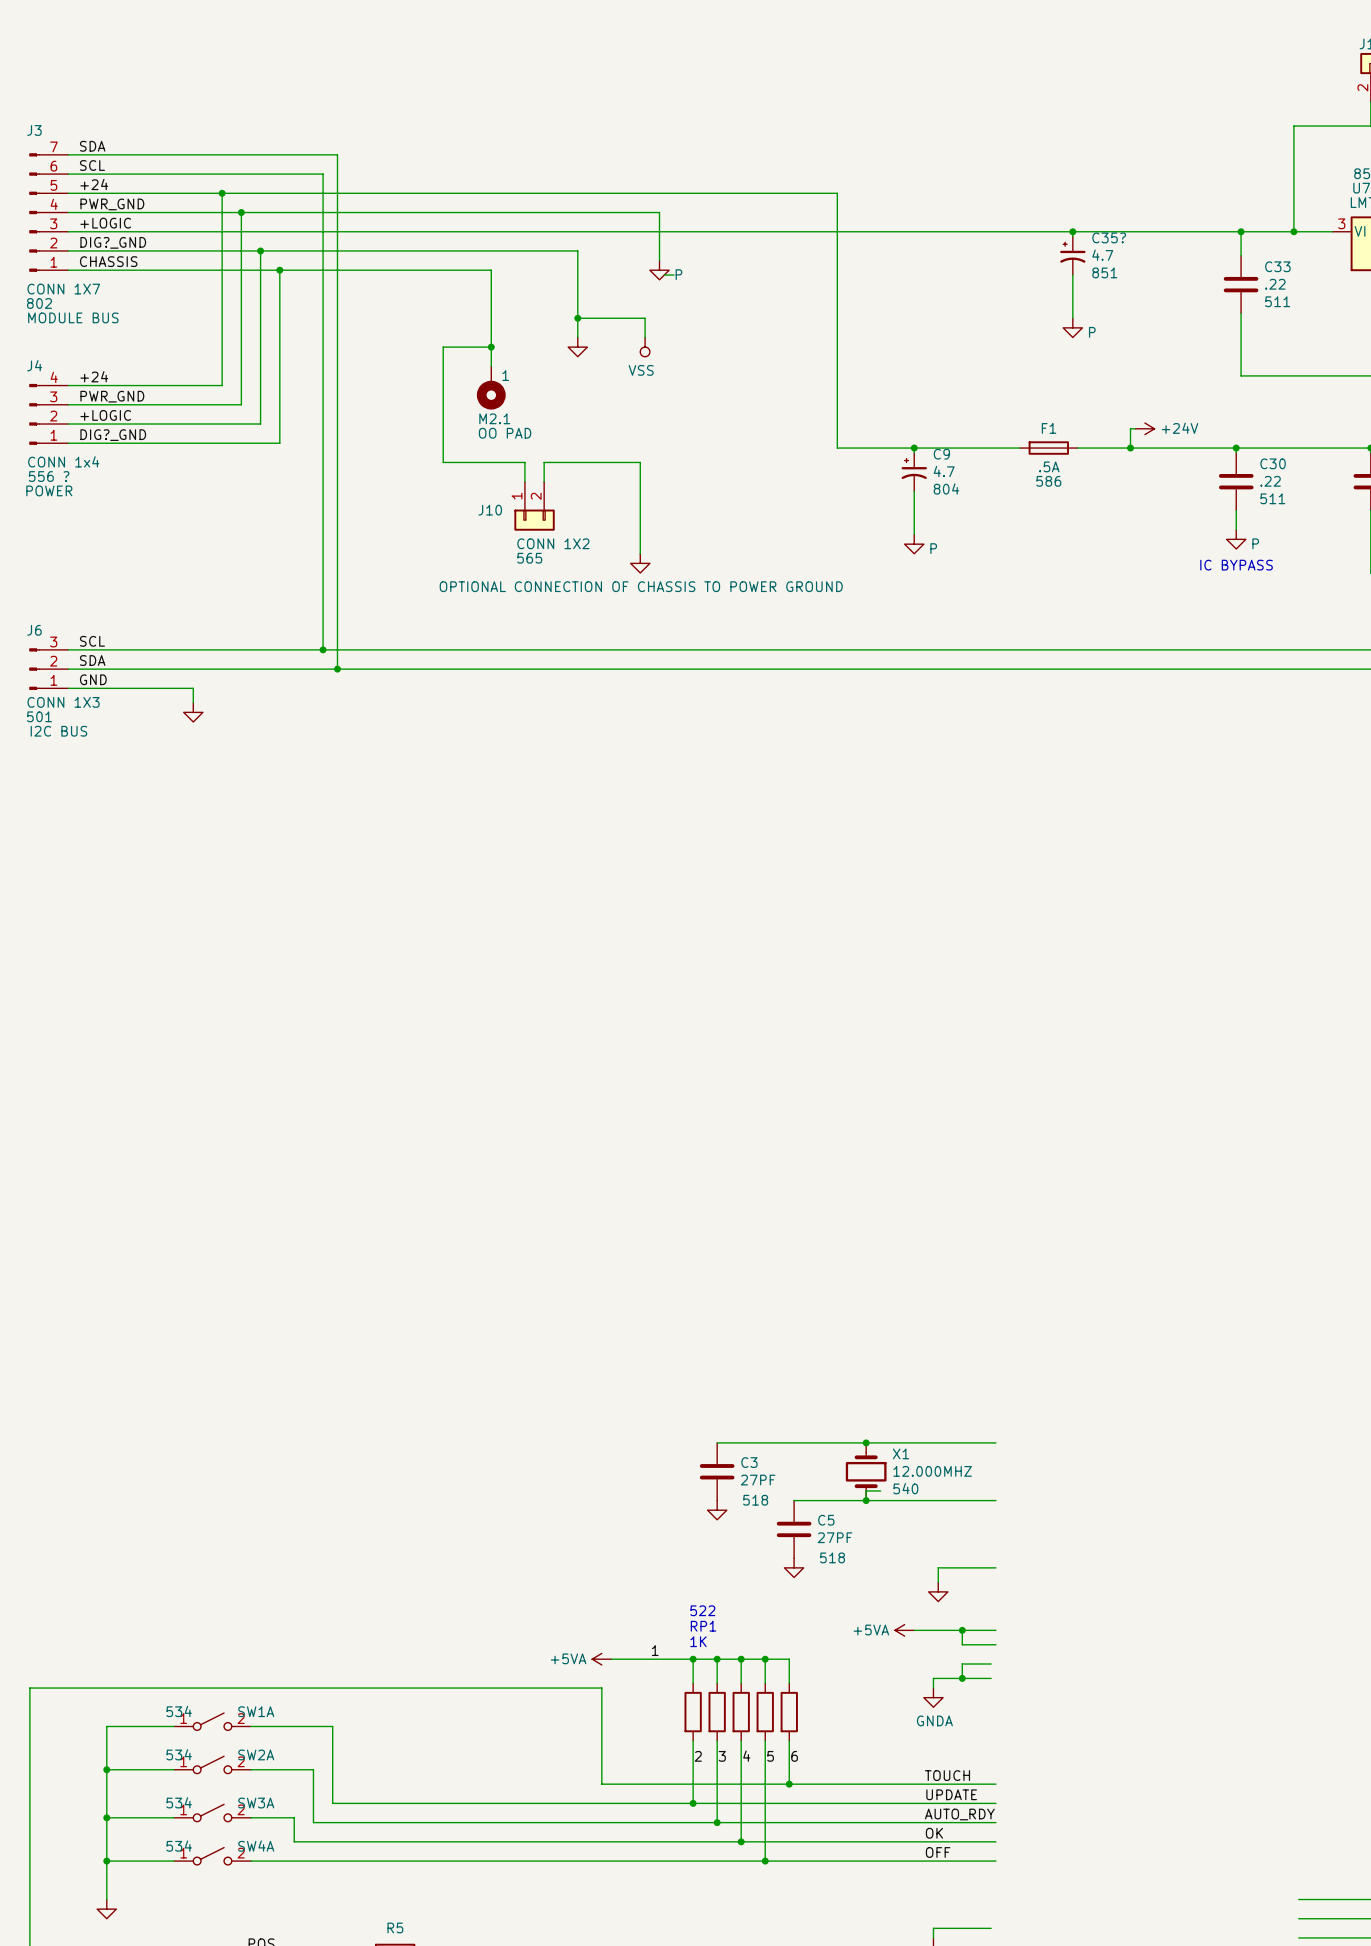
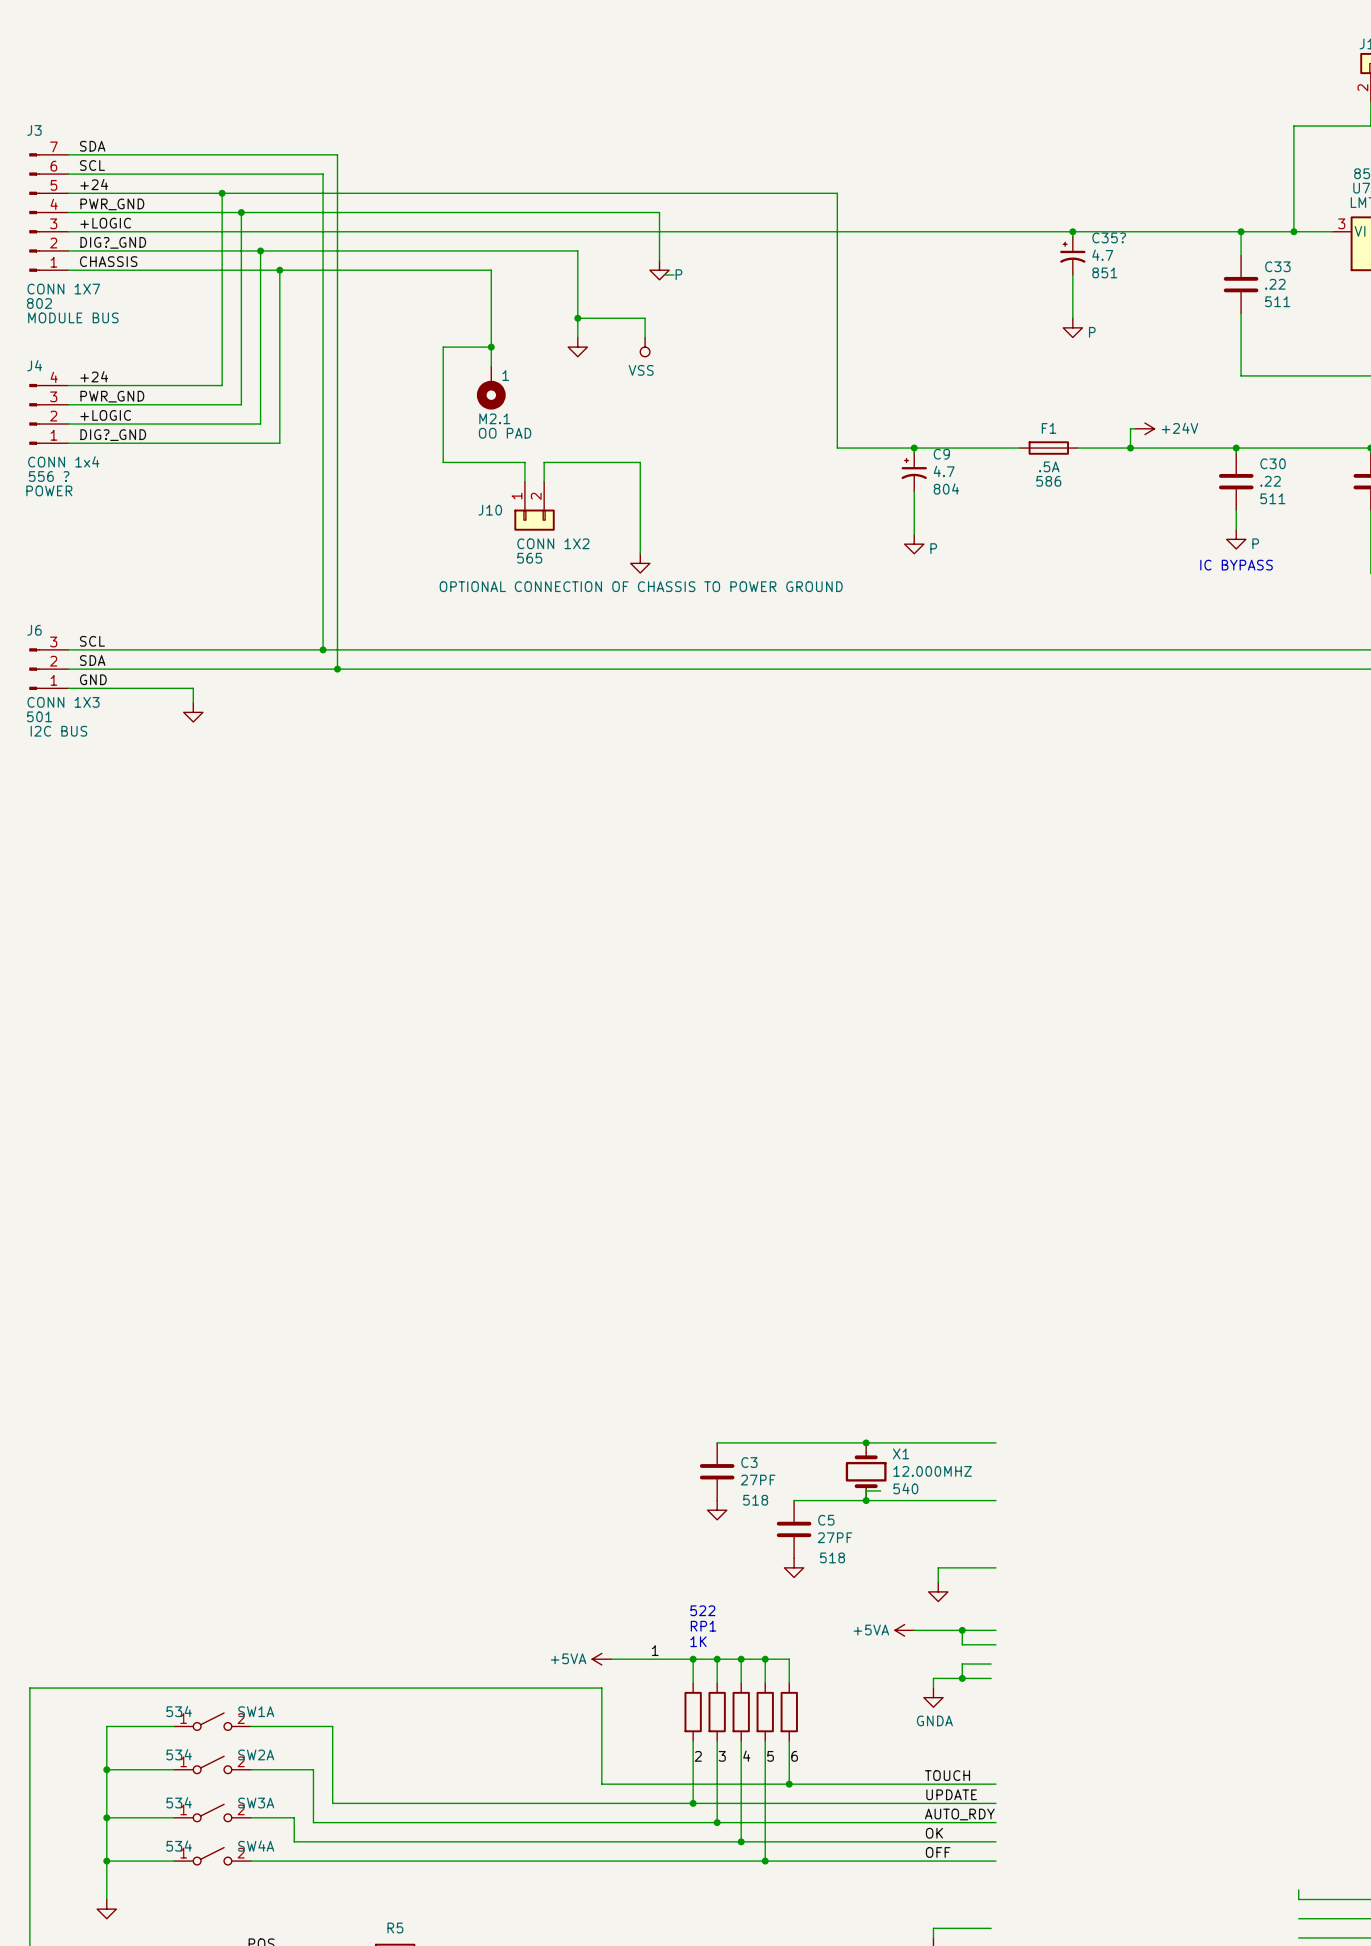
wire: none -> (1298, 1889) (1298, 1899)

